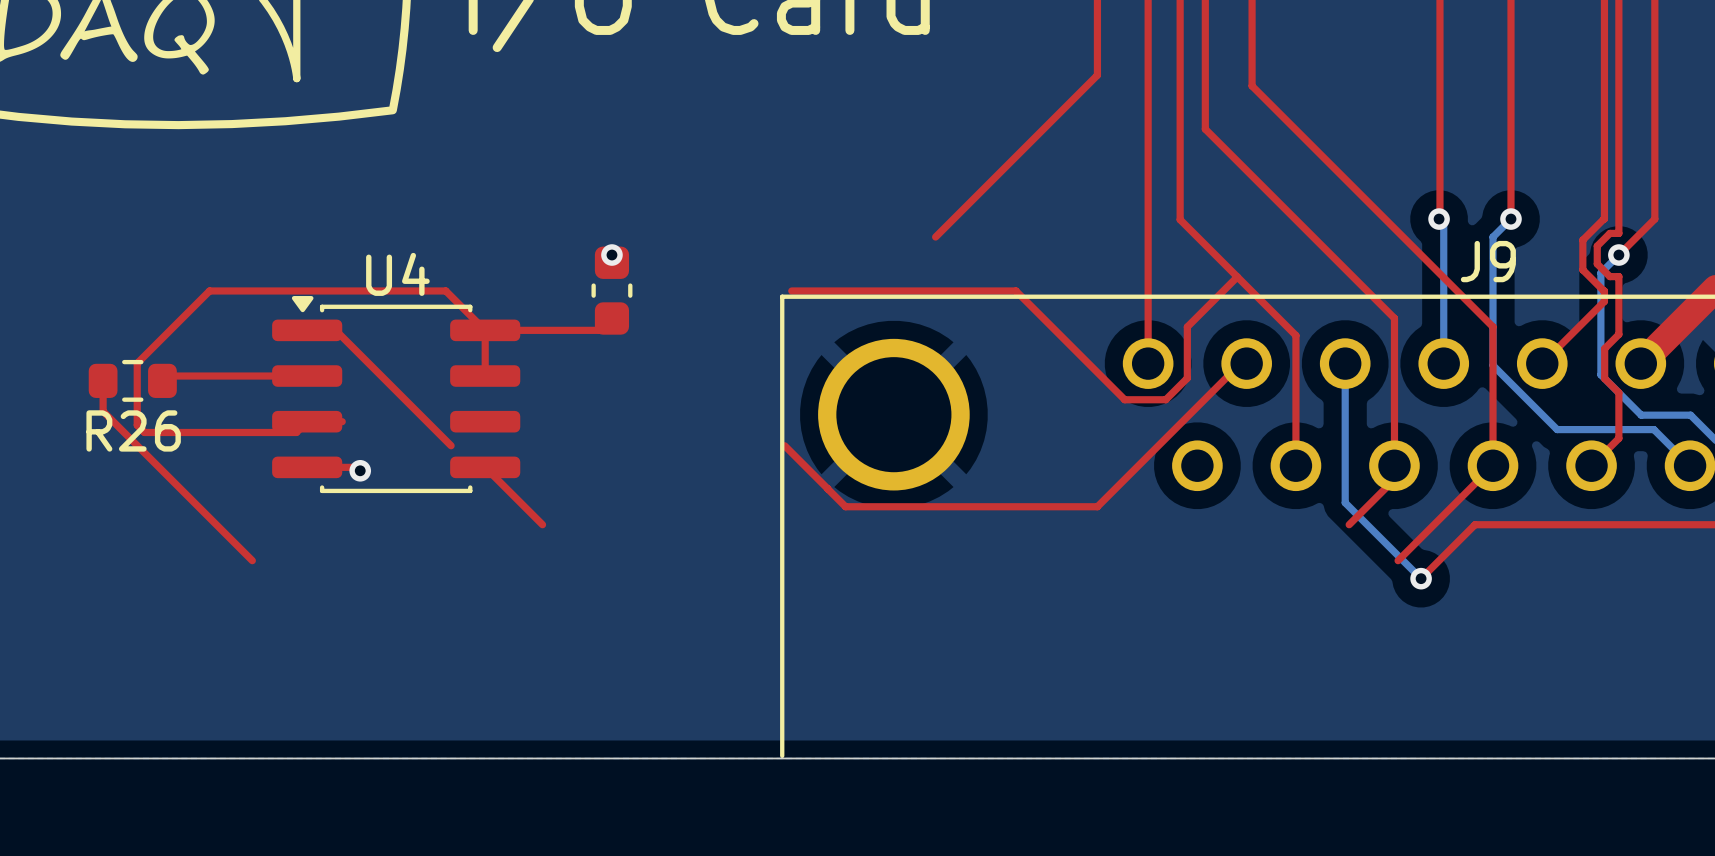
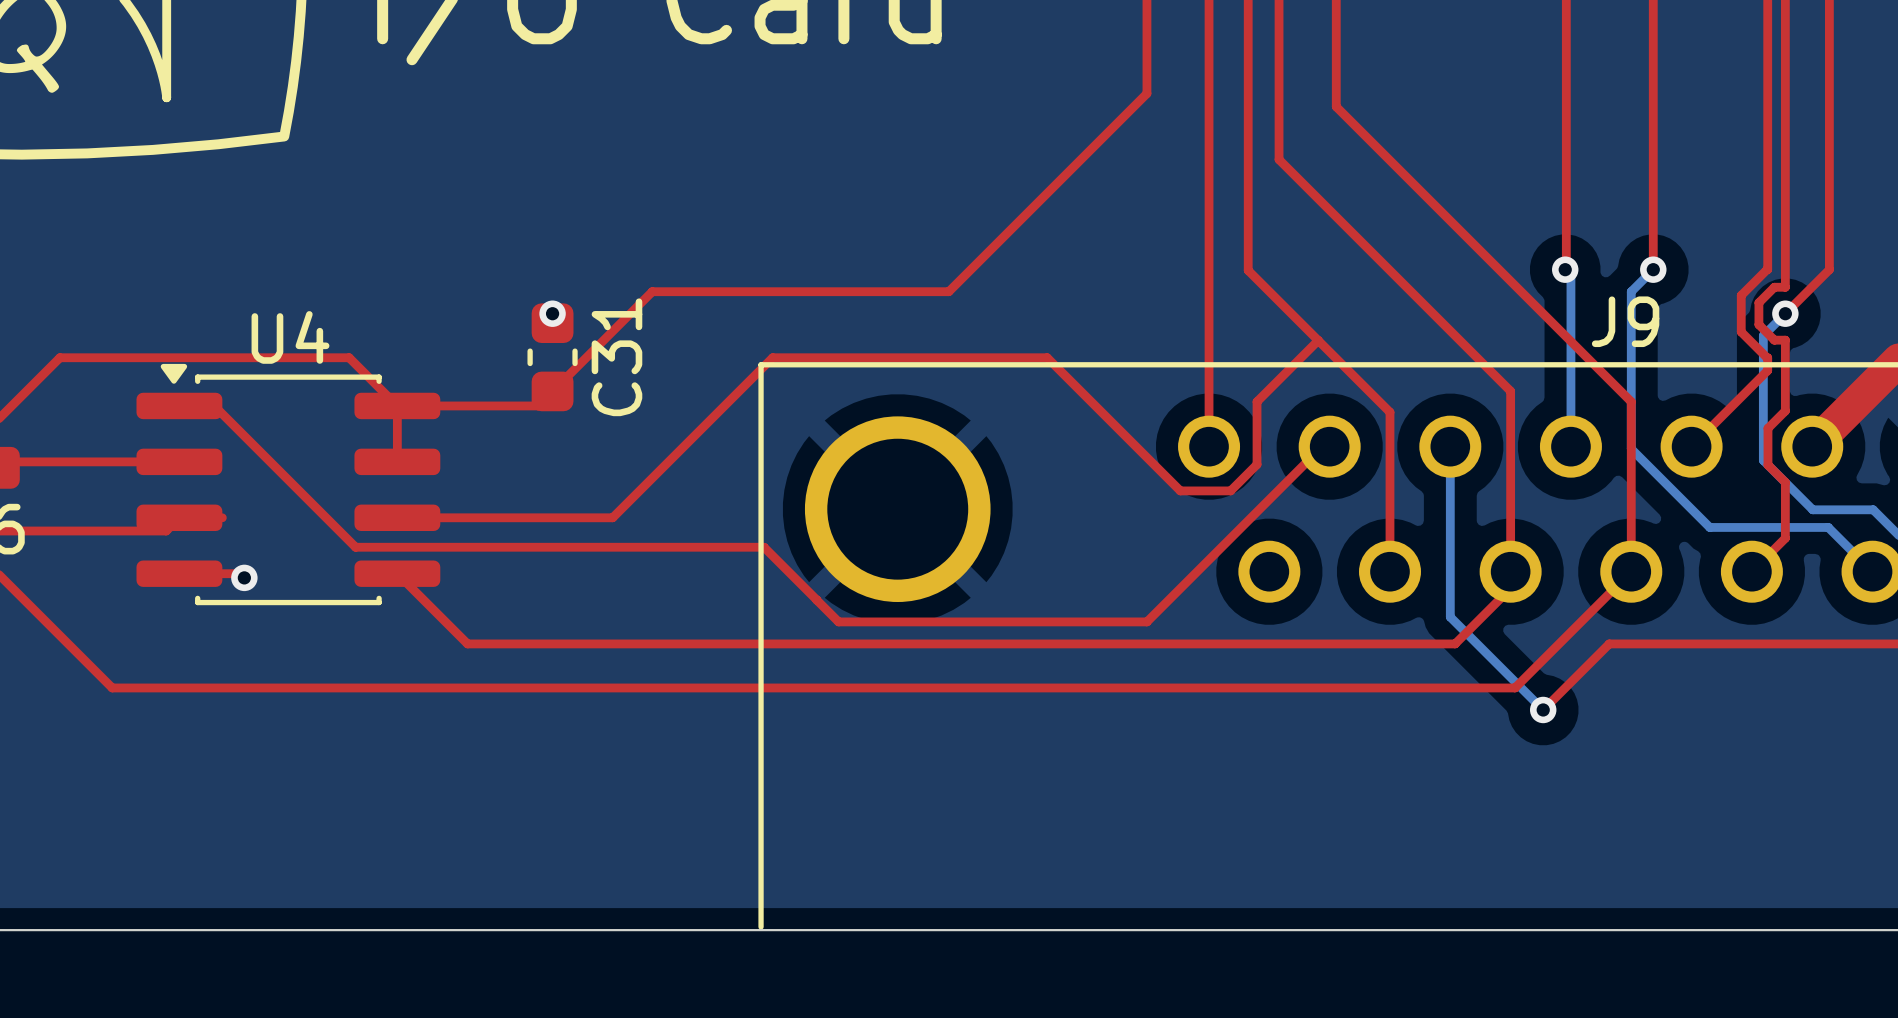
top track: none -> (948, 291) (652, 291) (552, 391)
C31 name: none -> C31 (616, 357)
top track: none -> (772, 357) (612, 517) (397, 517)
top track: none -> (355, 547) (764, 547)
top track: none -> (467, 643) (1455, 643)
top track: none -> (112, 687) (1515, 687)

